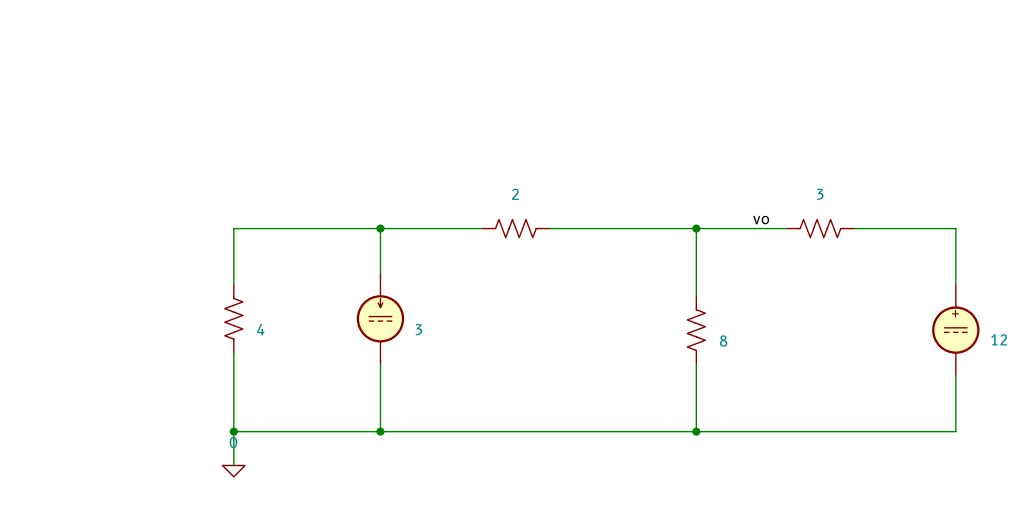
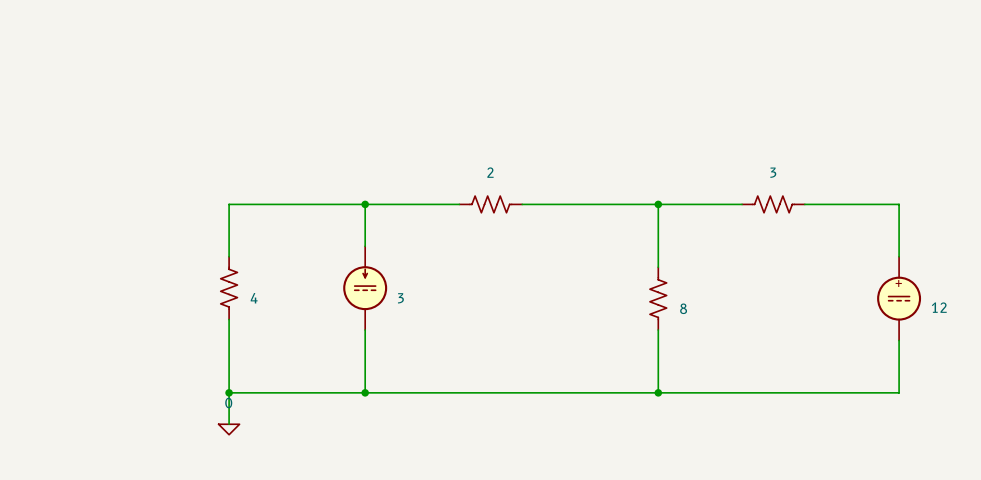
label: vo (761, 220) -> none

